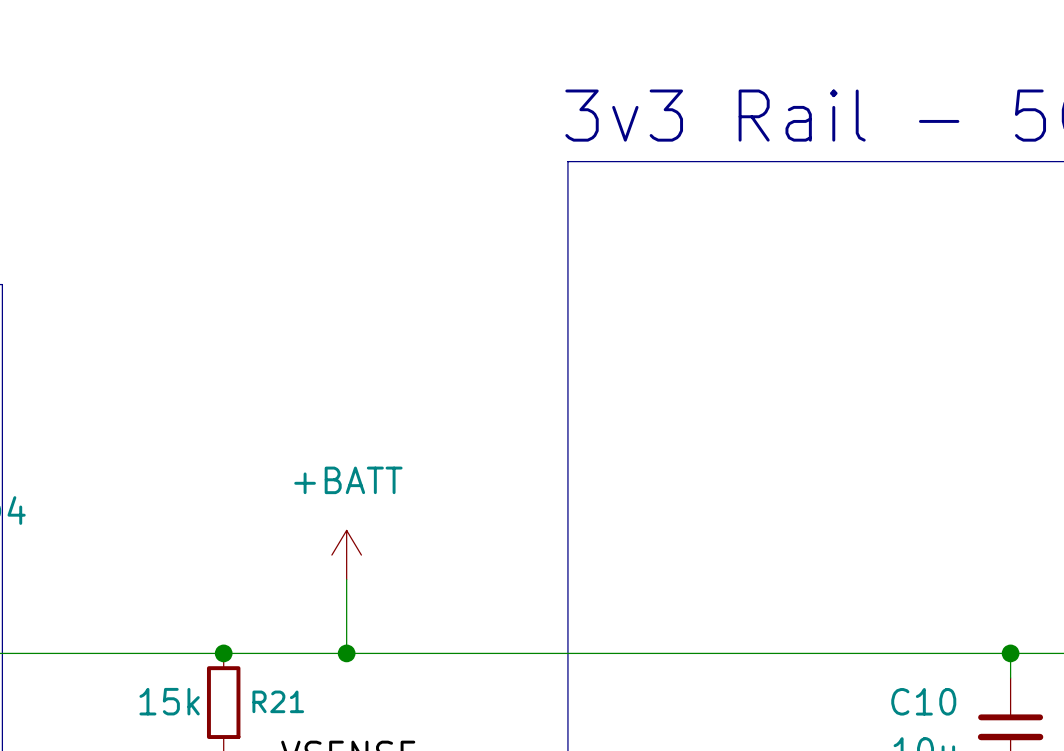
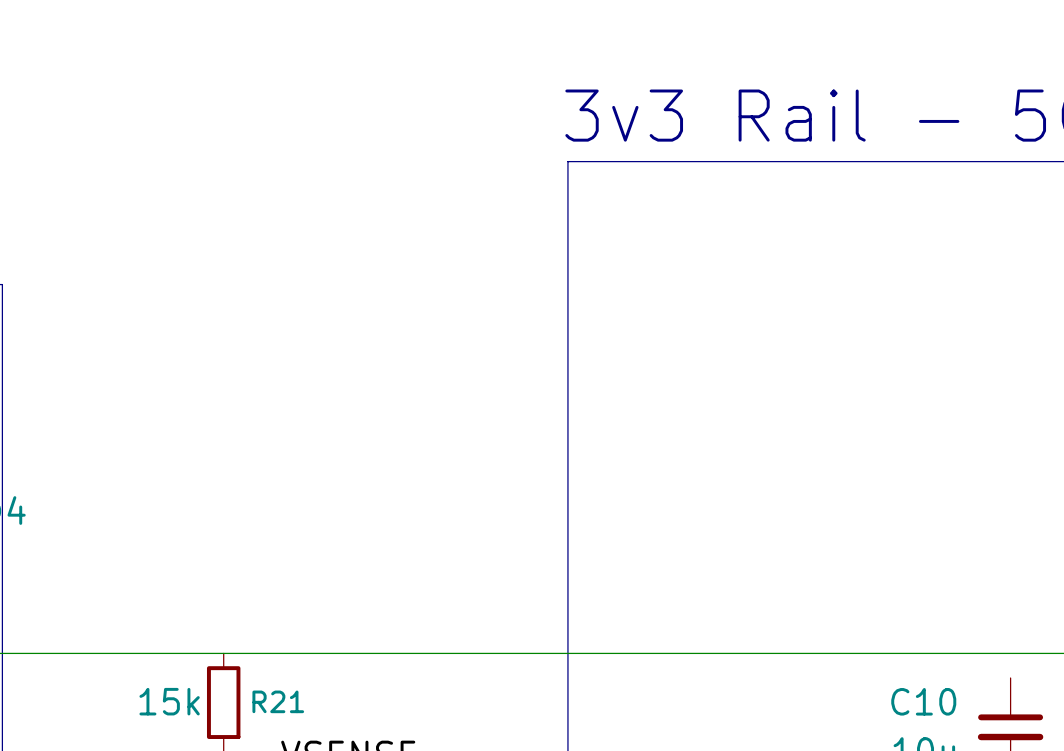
power symbol: +BATT (346, 555) -> none
wire: (346, 579) (346, 653) -> none
junction: (223, 653) -> none
junction: (346, 653) -> none
wire: (1010, 653) (1010, 678) -> none
junction: (1010, 653) -> none

